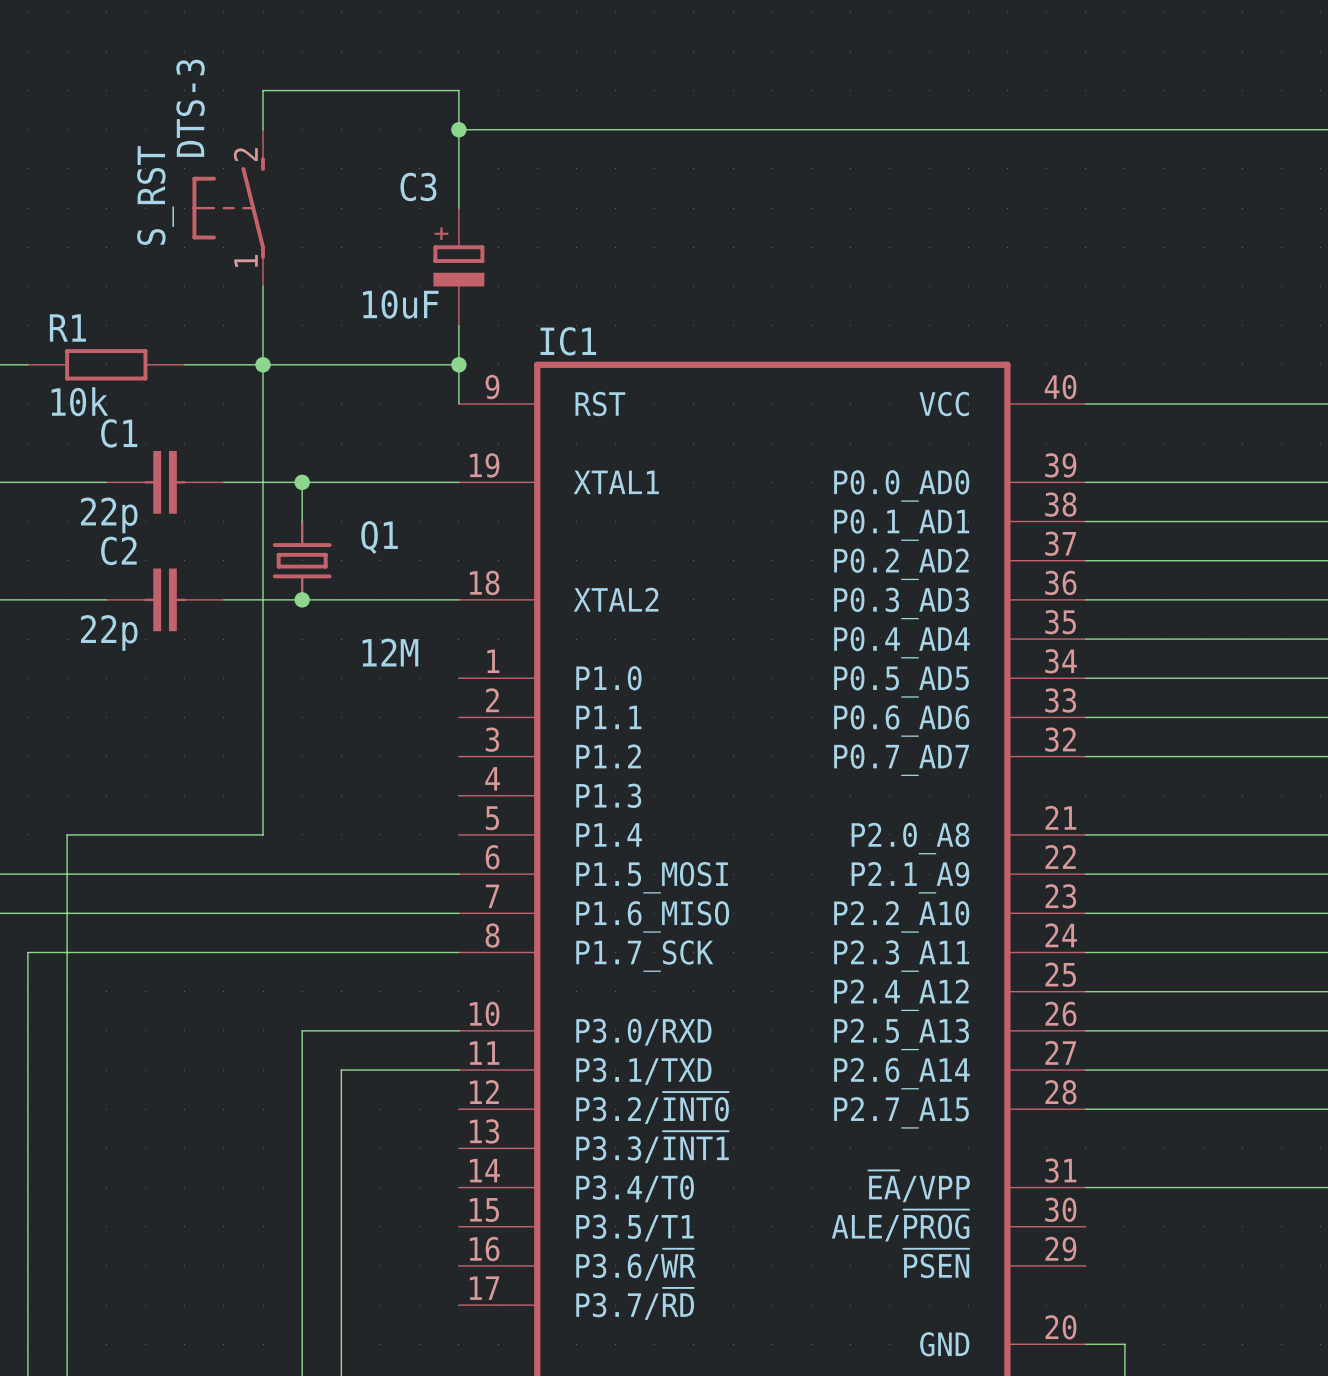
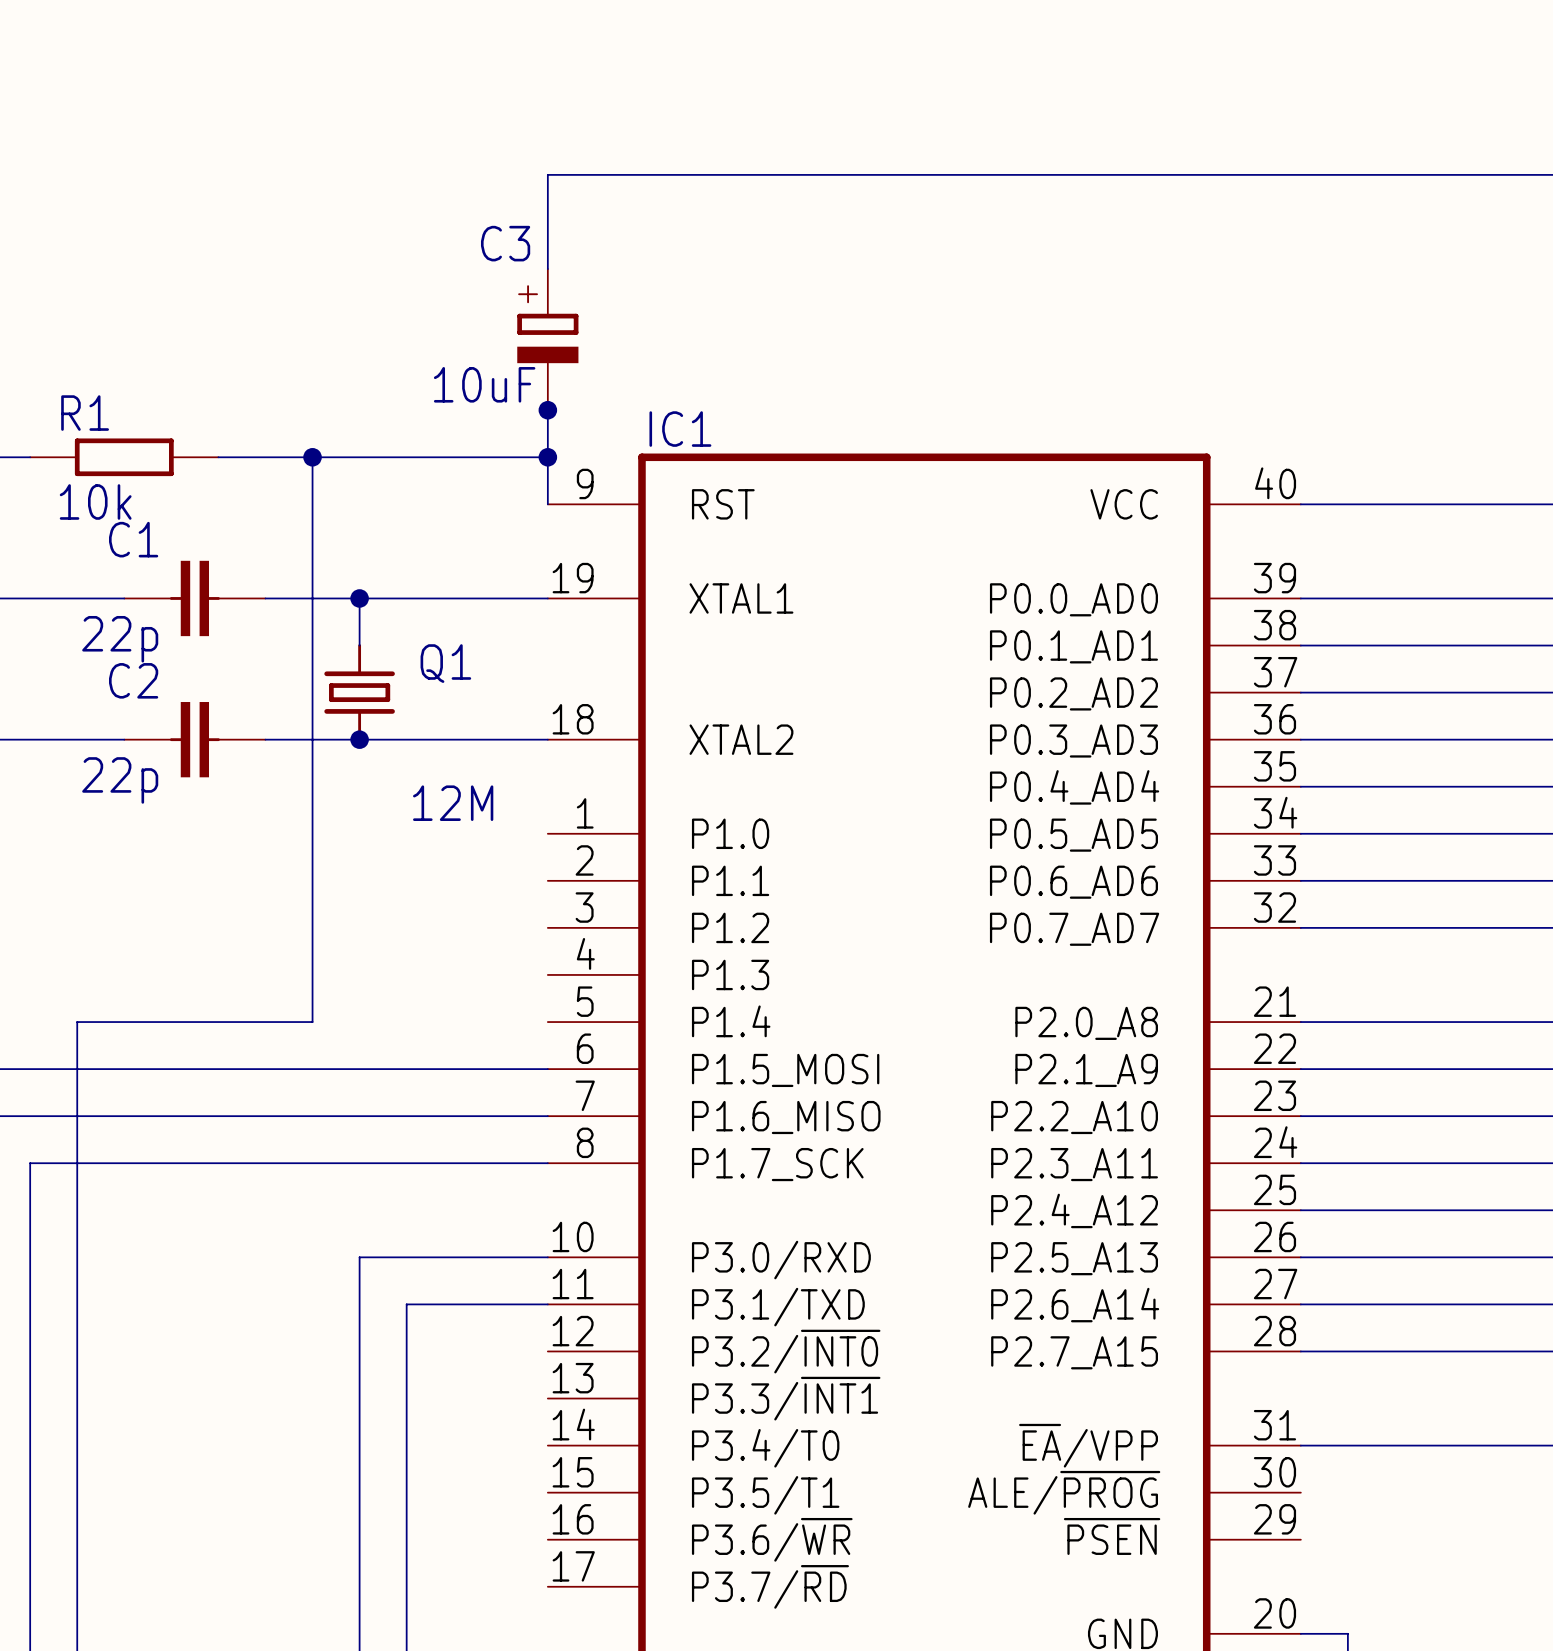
wire: (263, 129) (263, 90) (458, 90) (458, 129) -> none
junction: (458, 129) -> none
S_RST: DTS-3 (228, 208) -> none
wire: (263, 286) (263, 364) -> none
junction: none -> (547, 410)

